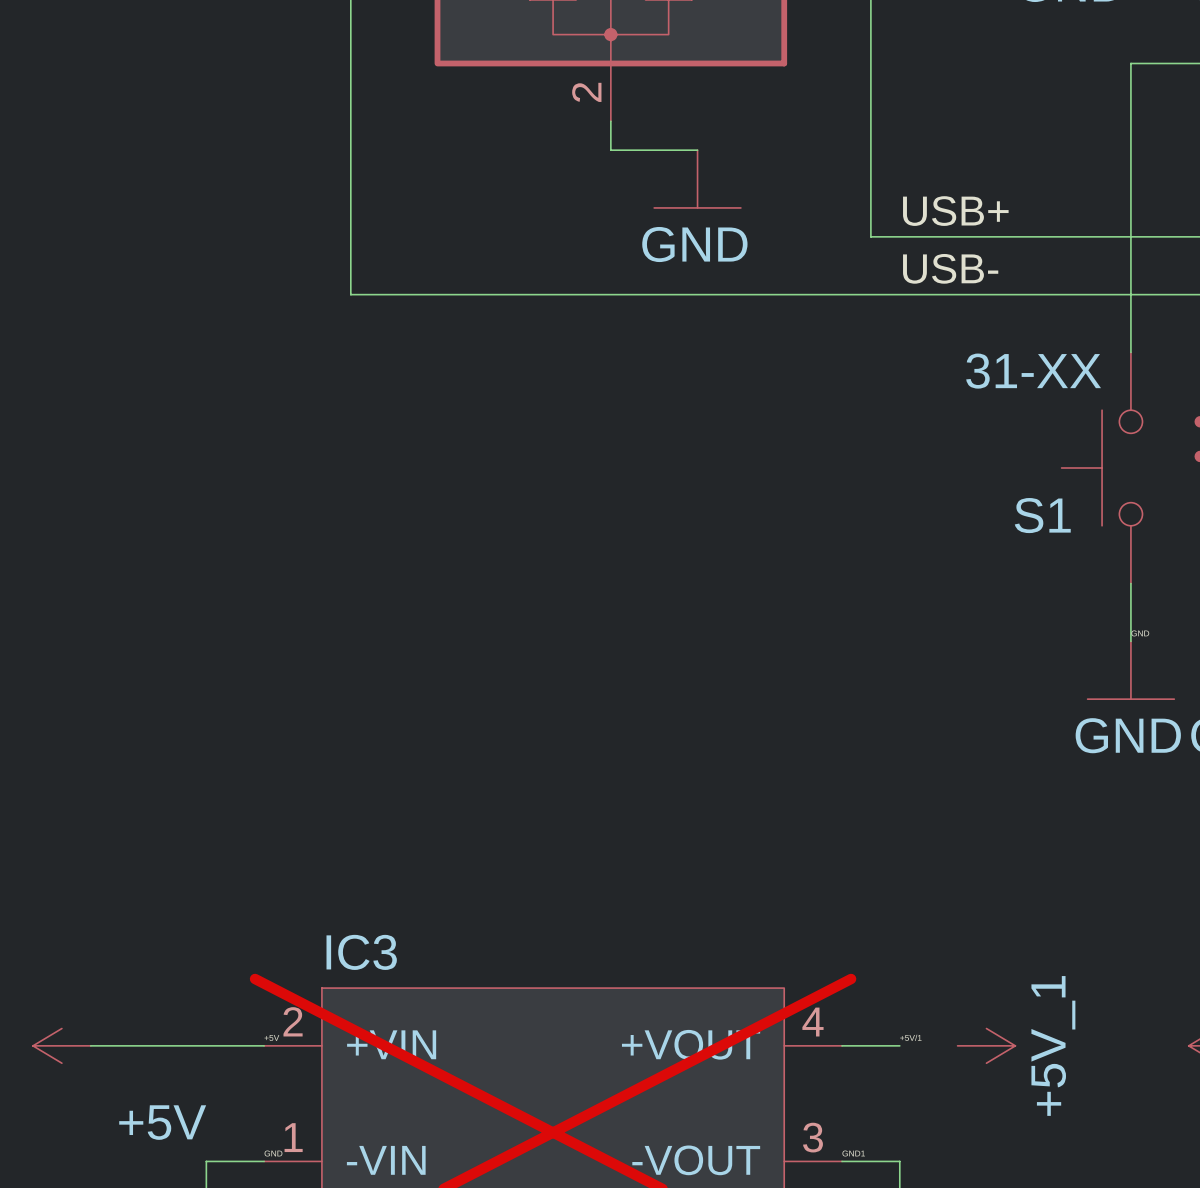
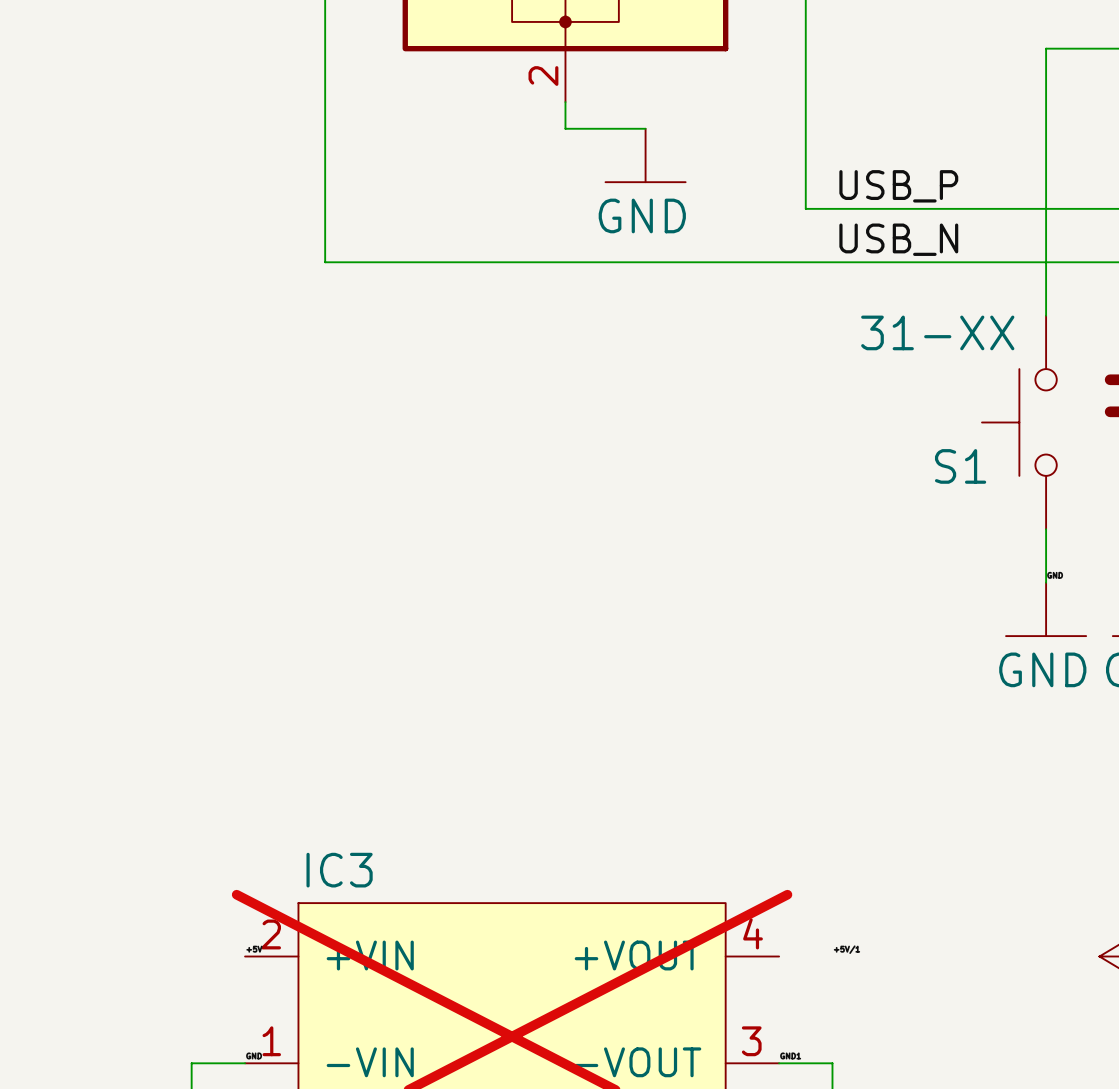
label: USB+ (955, 211) -> USB_P (898, 186)
label: USB- (950, 268) -> USB_N (898, 239)
power symbol: +5V (61, 1045) -> none
wire: (90, 1045) (264, 1045) -> none
wire: (842, 1045) (899, 1045) -> none
power symbol: +5V_1 (986, 1045) -> none

